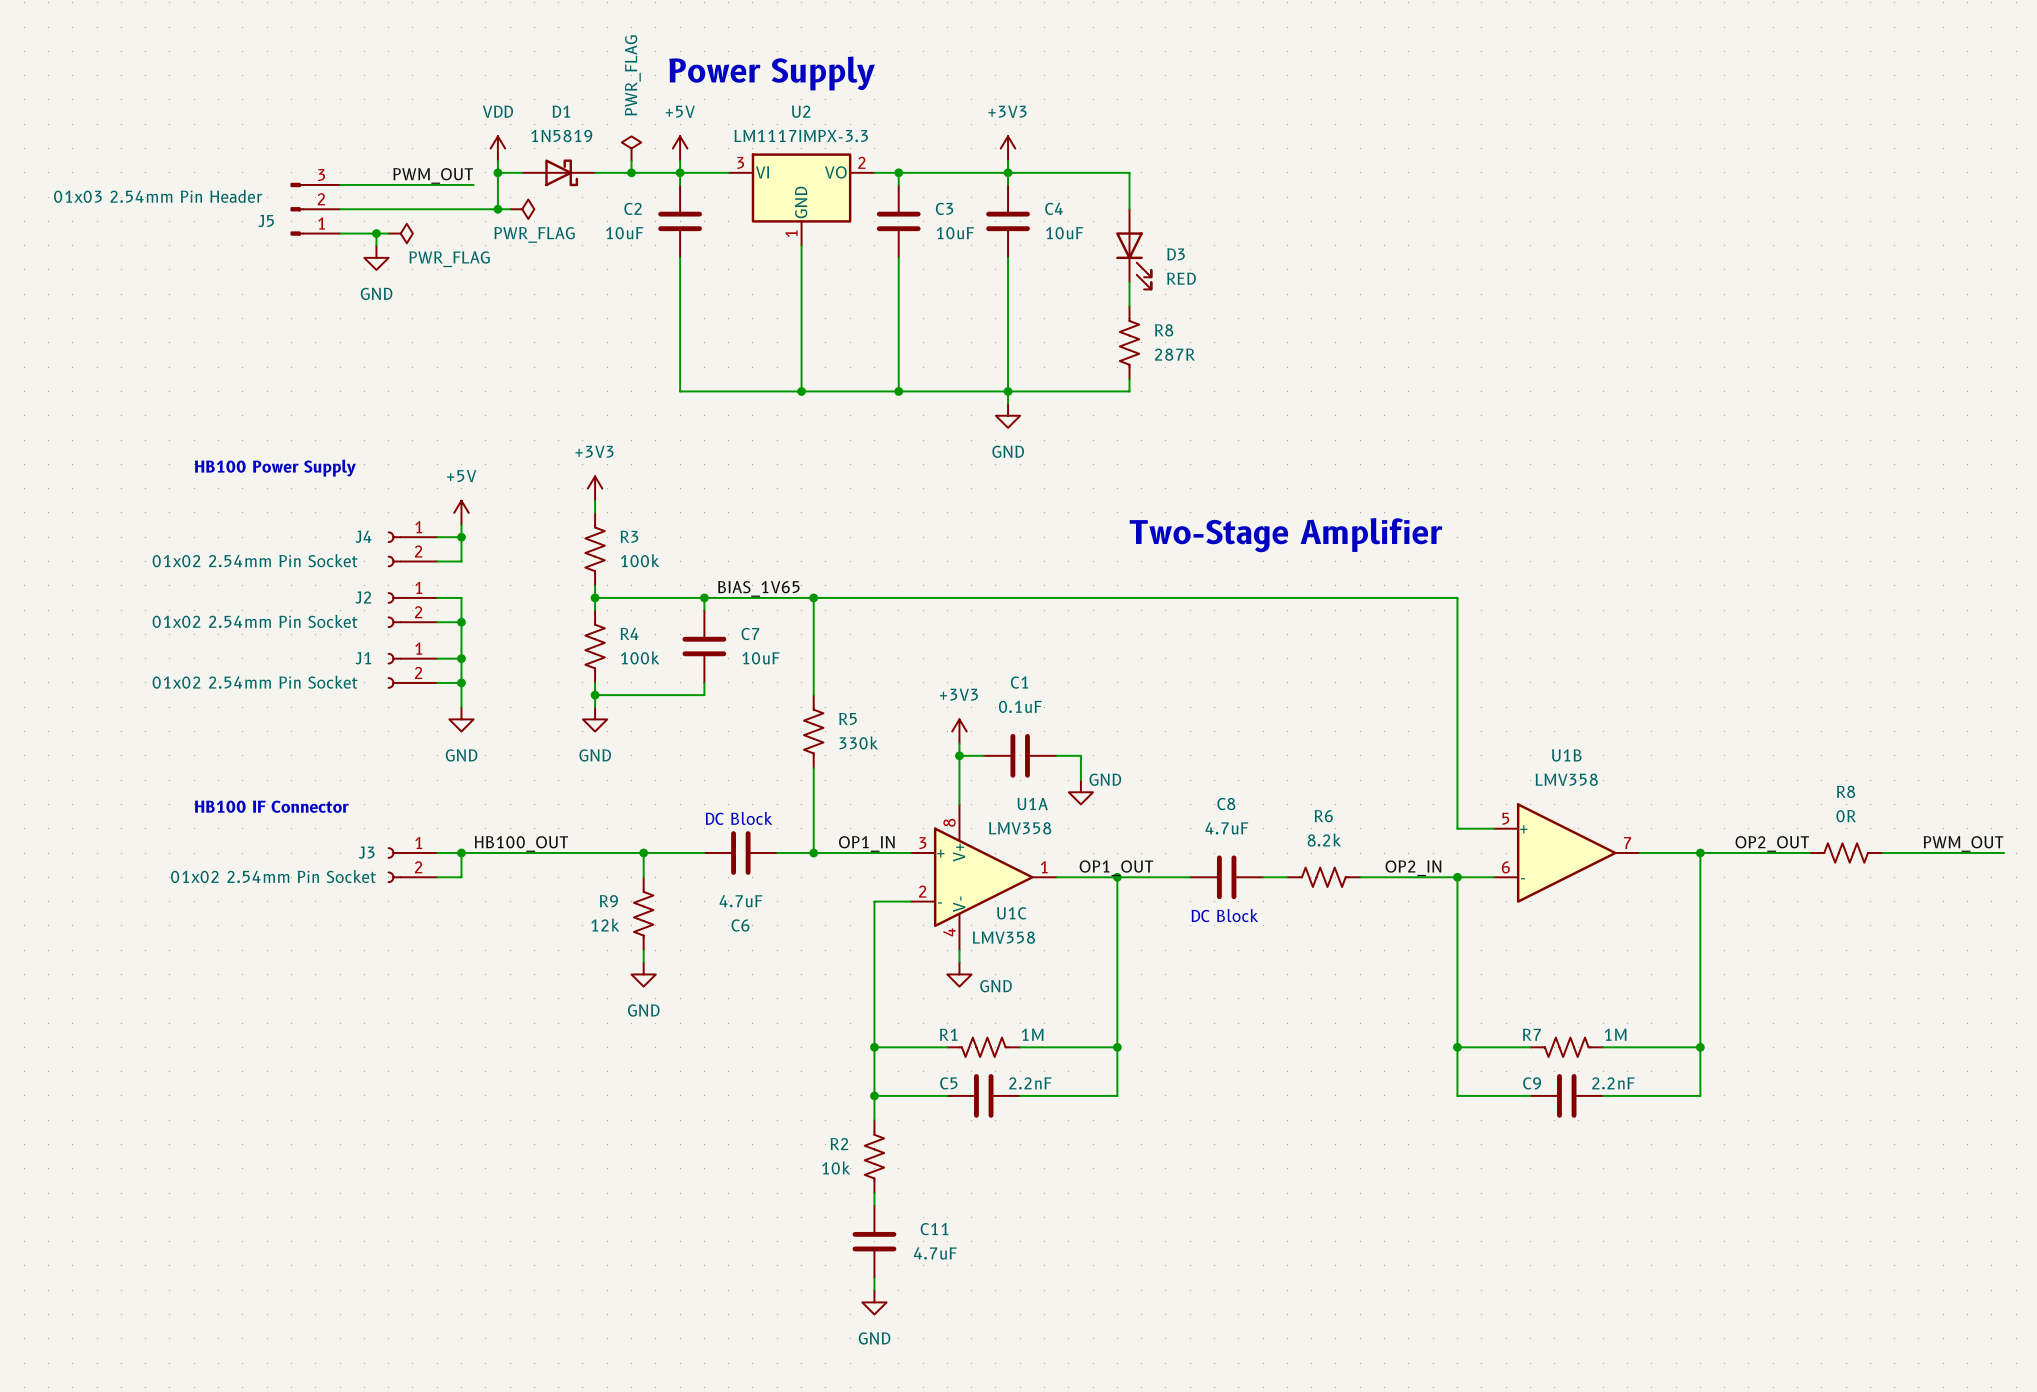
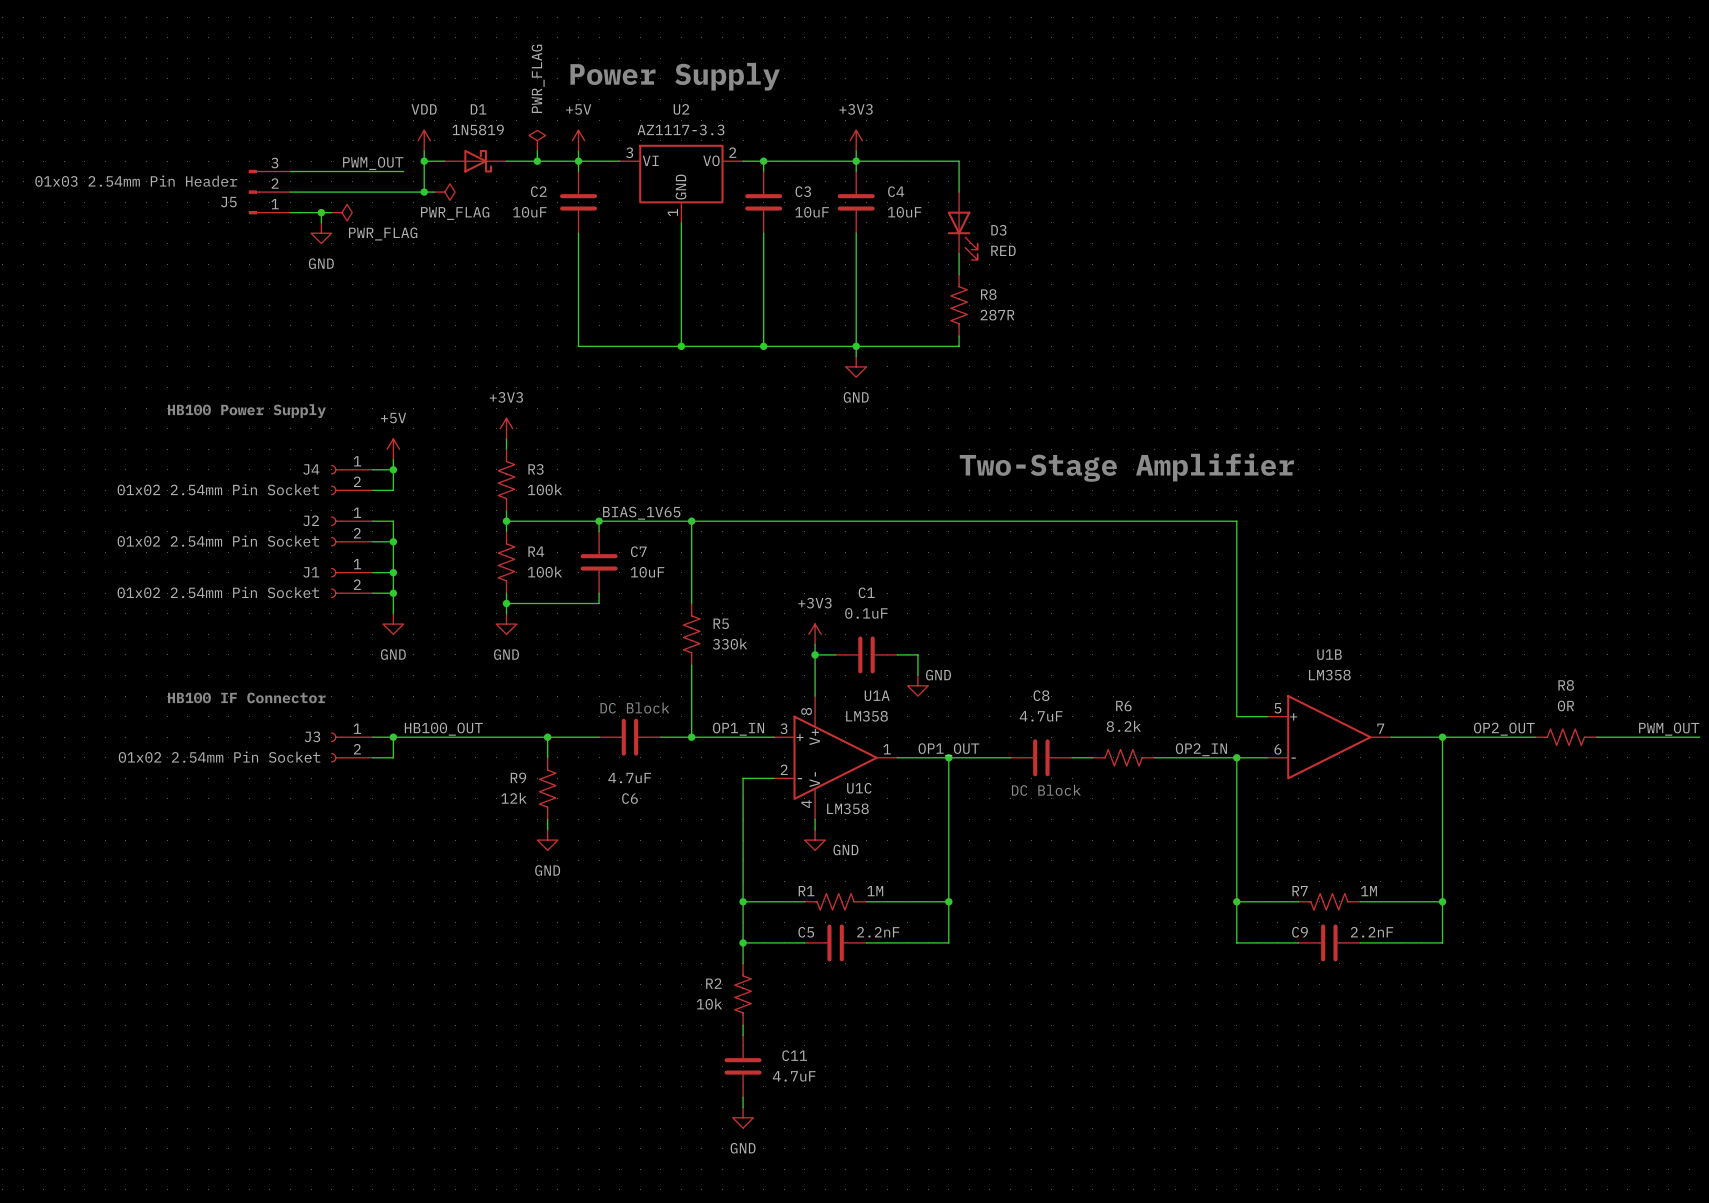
U2 value: LM1117IMPX-3.3 (801, 136) -> AZ1117-3.3 (680, 129)
U1B value: LMV358 (1566, 779) -> LM358 (1329, 675)
U1A value: LMV358 (1020, 828) -> LM358 (866, 716)
U1C value: LMV358 (1003, 937) -> LM358 (847, 808)

